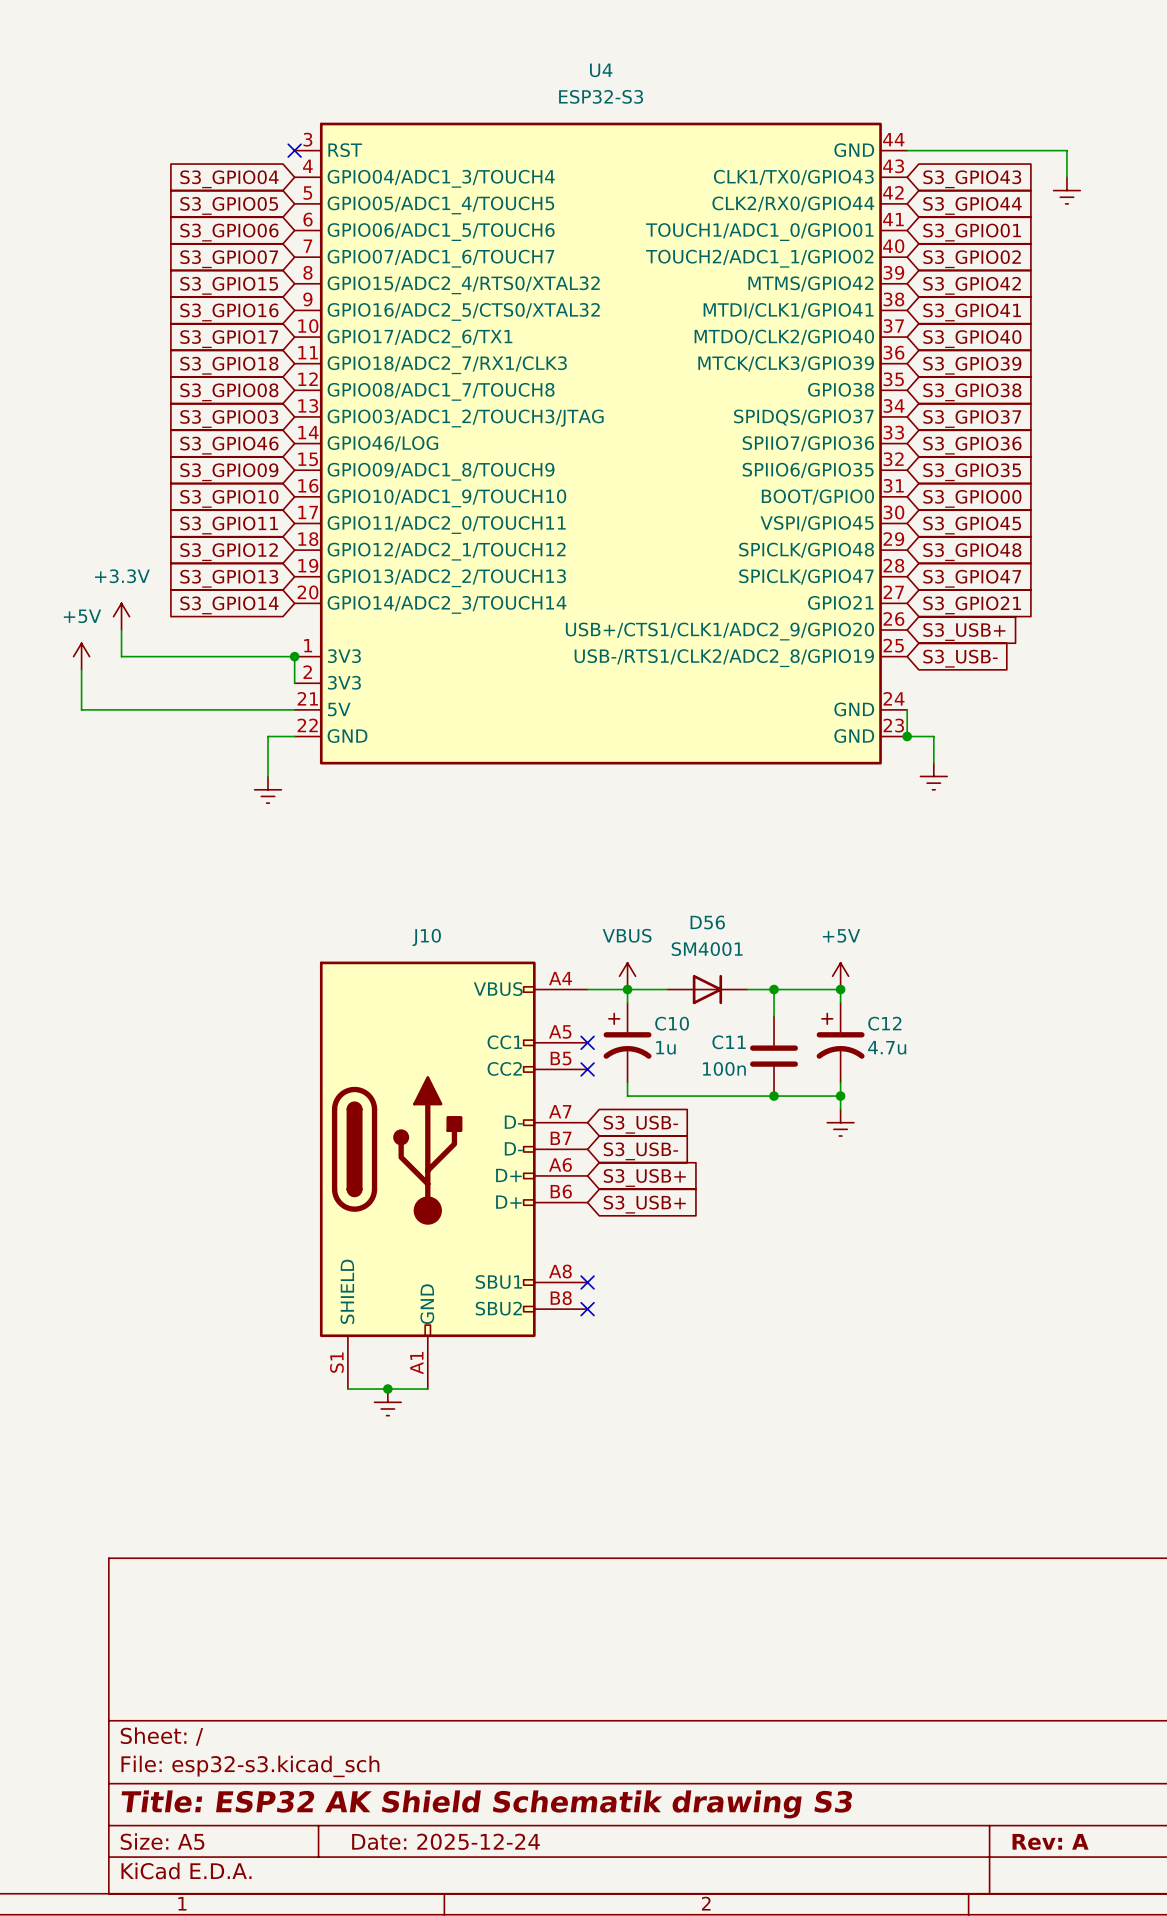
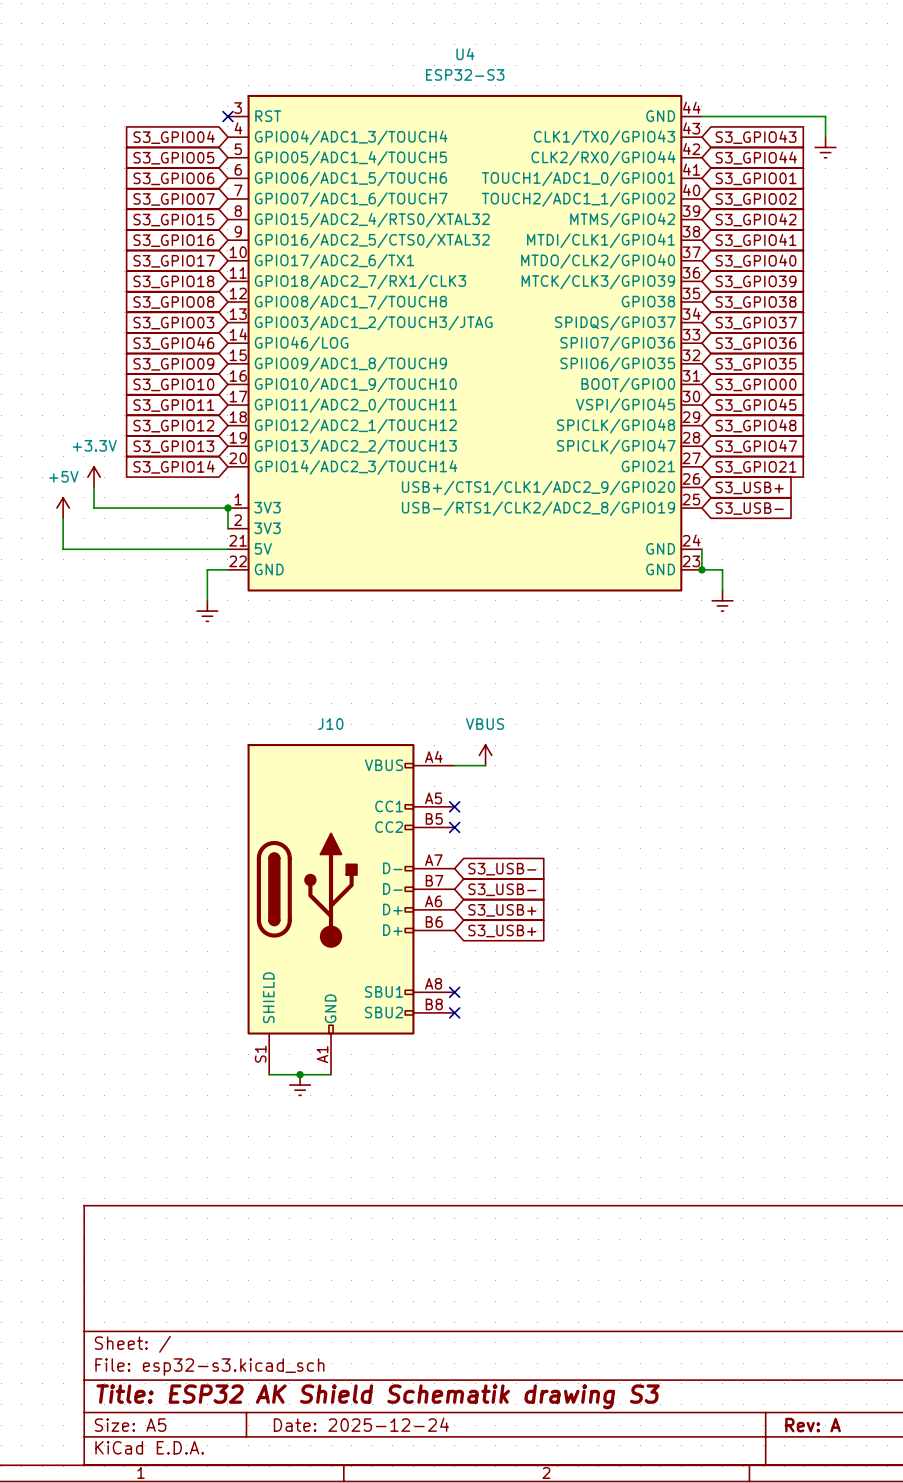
power symbol: +5V (840, 976) -> none
junction: (627, 989) -> none
wire: (667, 989) (627, 989) (627, 1002) -> none
D56: SM4001 (707, 989) -> none
wire: (747, 989) (840, 989) (840, 1002) -> none
wire: (774, 989) (774, 1016) -> none
junction: (774, 989) -> none
junction: (840, 989) -> none
C10: 1u (627, 1042) -> none
C12: 4.7u (840, 1042) -> none
C11: 100n (774, 1056) -> none
wire: (627, 1082) (627, 1096) (840, 1096) -> none
wire: (840, 1082) (840, 1109) -> none
junction: (774, 1096) -> none
junction: (840, 1096) -> none
power symbol: (840, 1122) -> none

